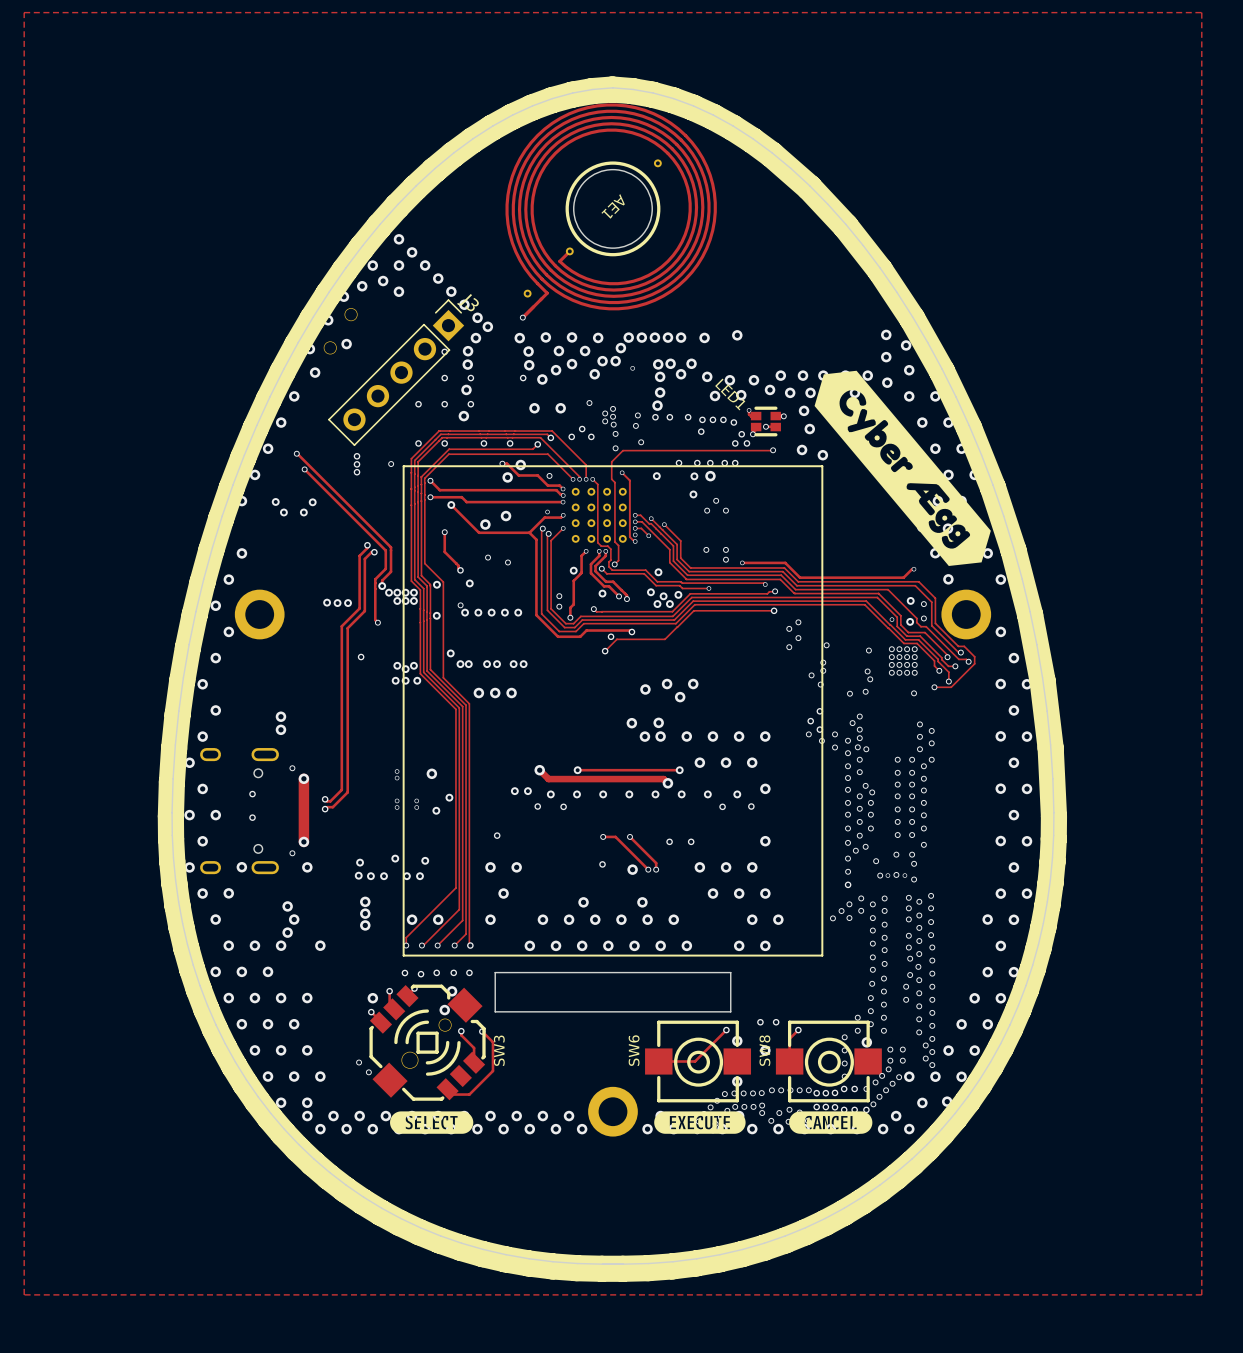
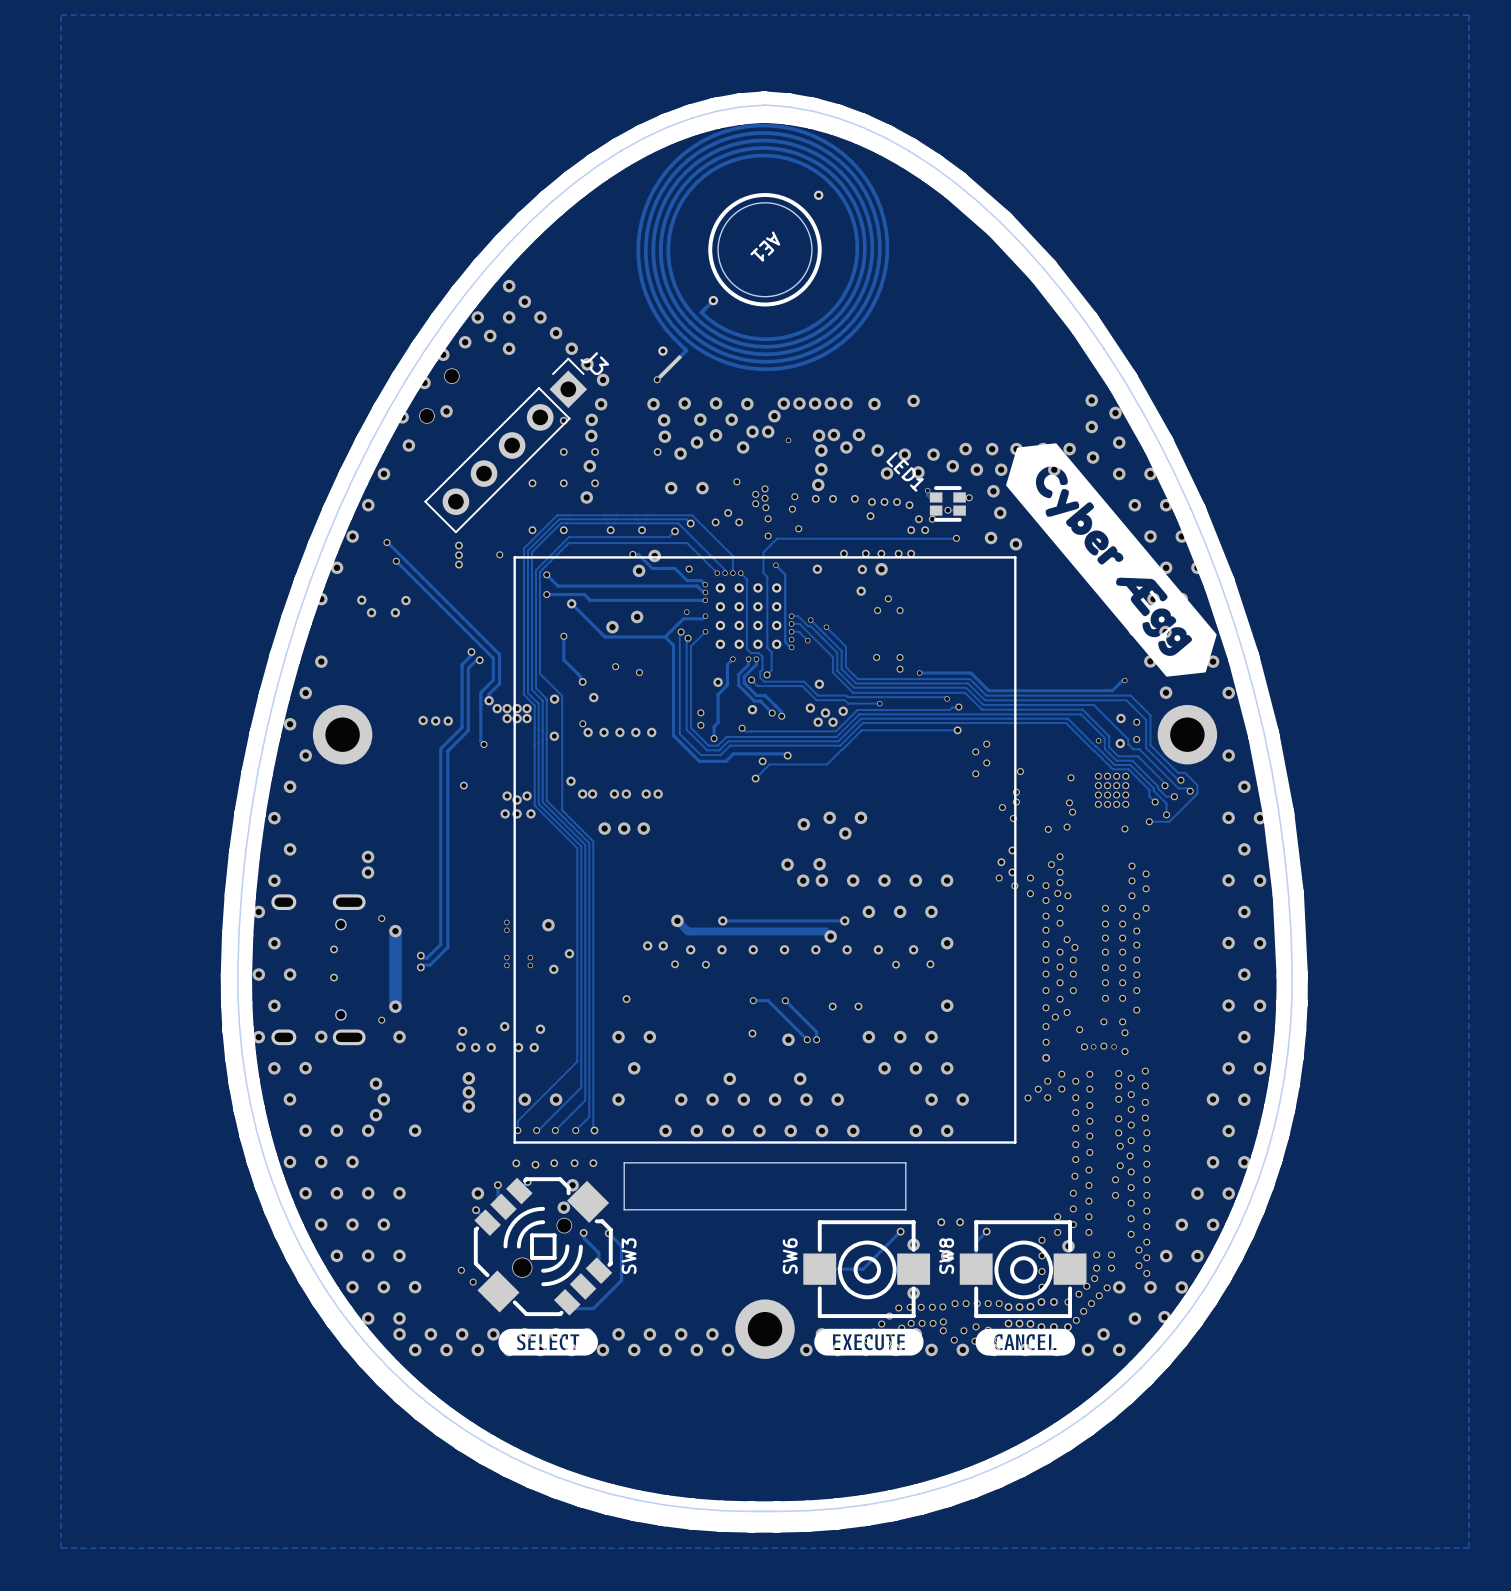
via: (487, 326) -> none

